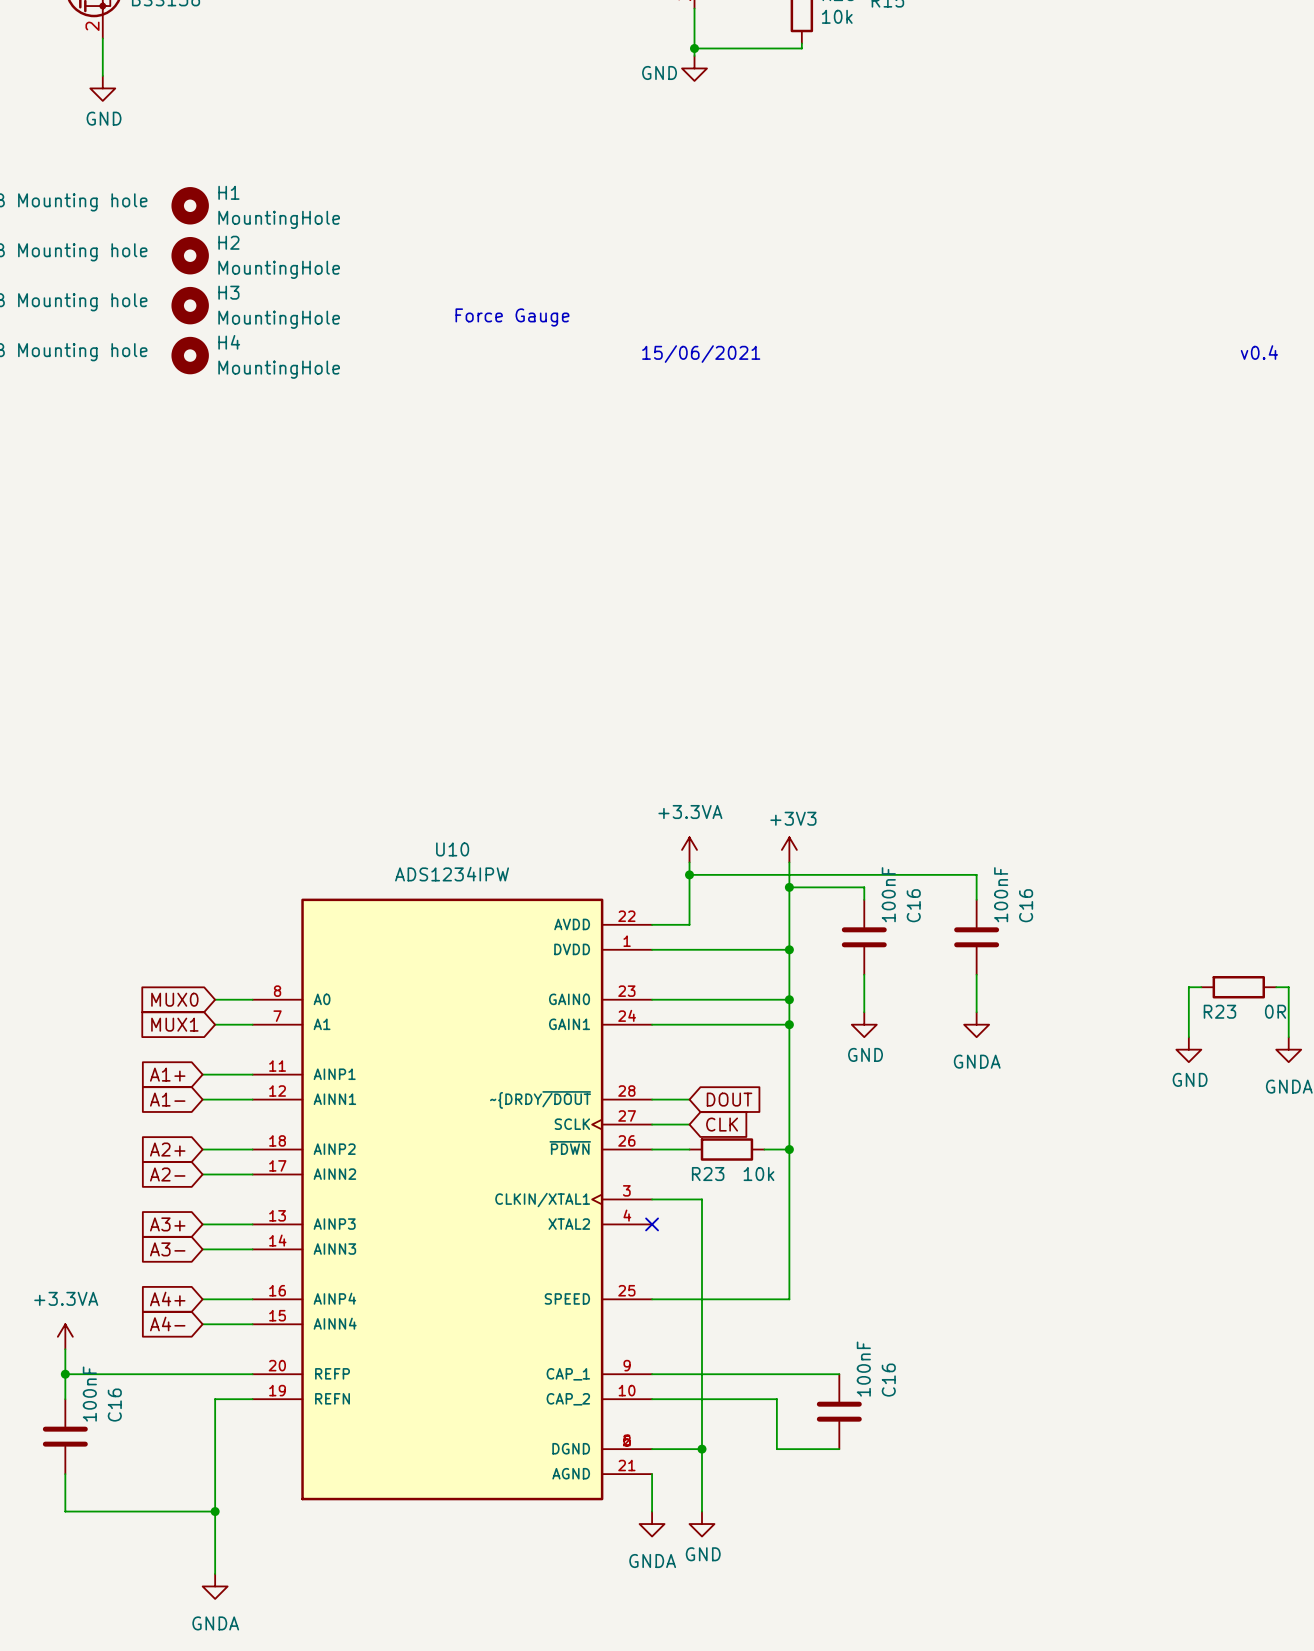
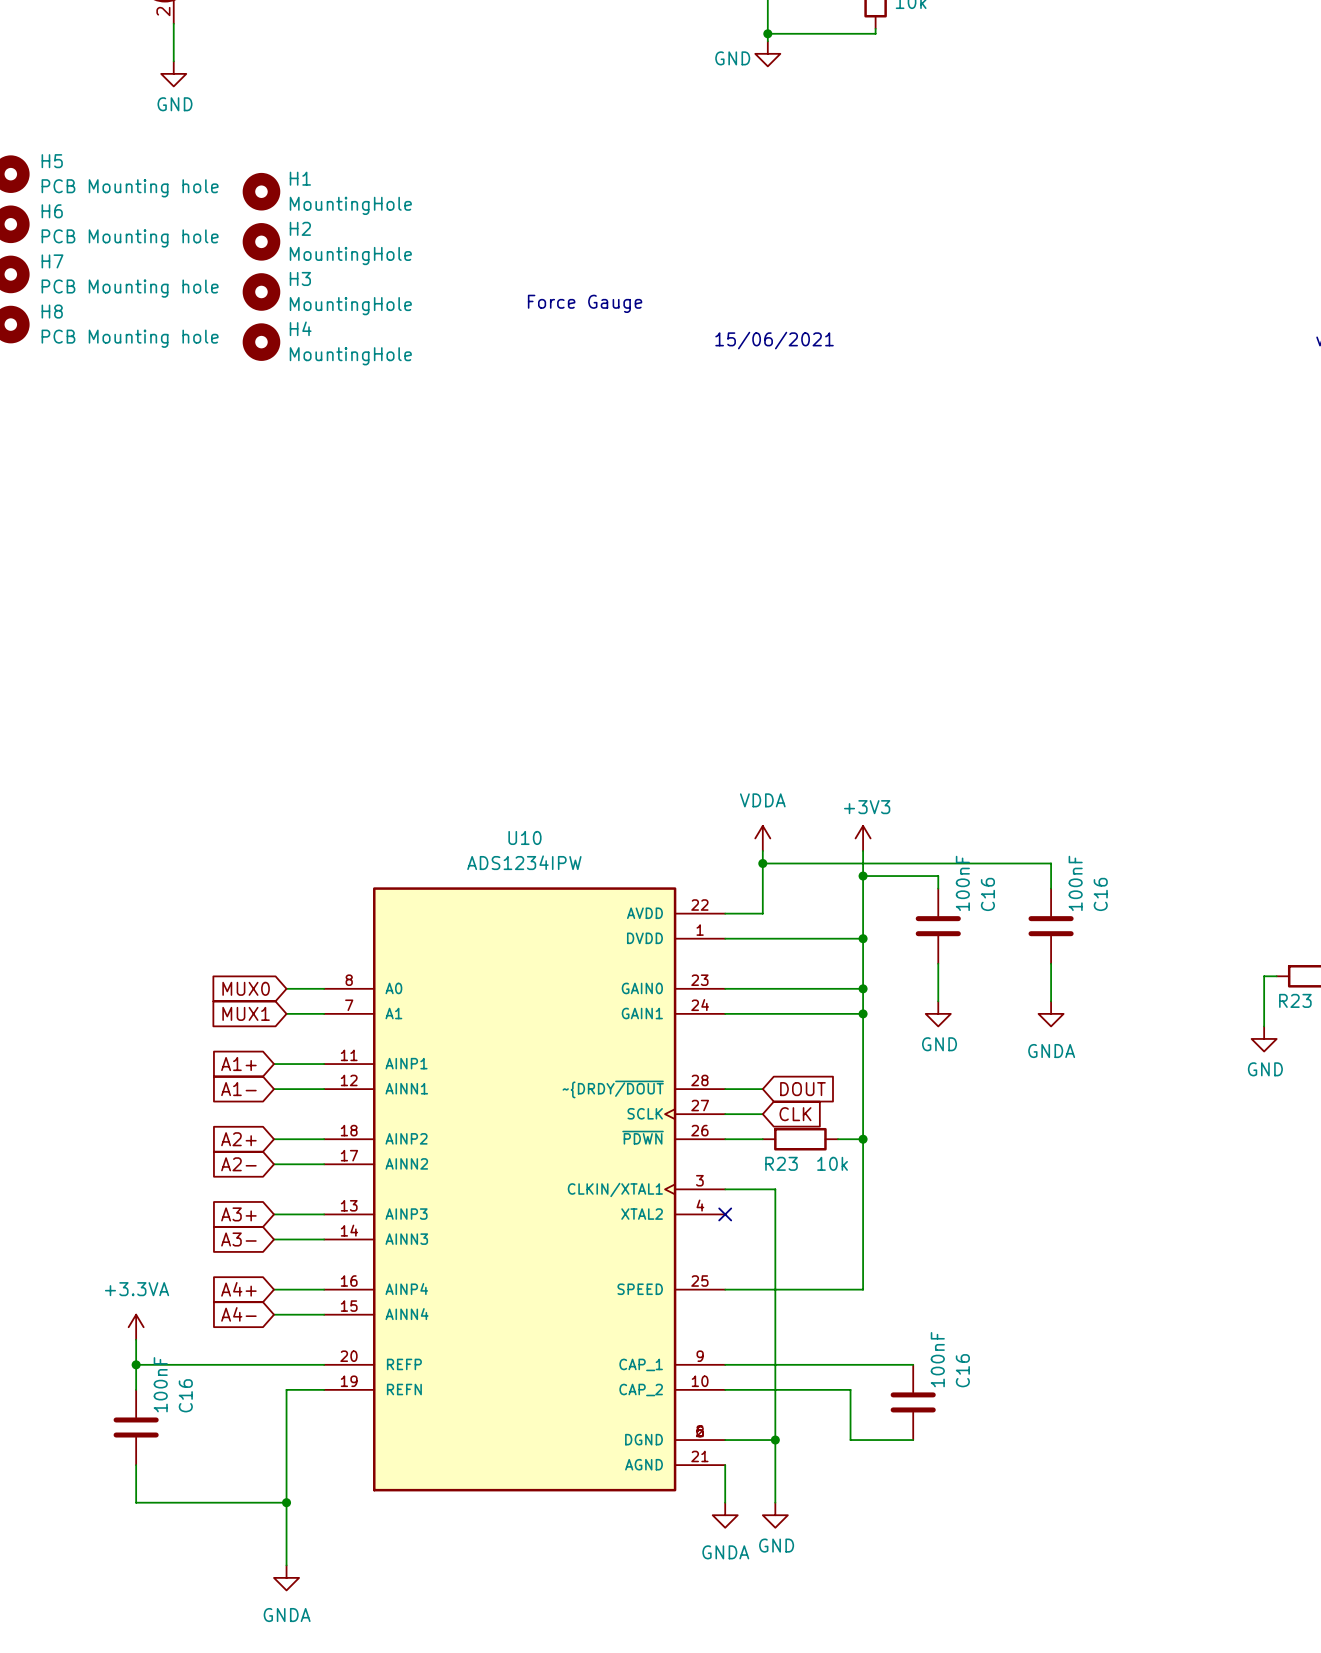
power symbol: +3.3VA (689, 849) -> VDDA (762, 838)

